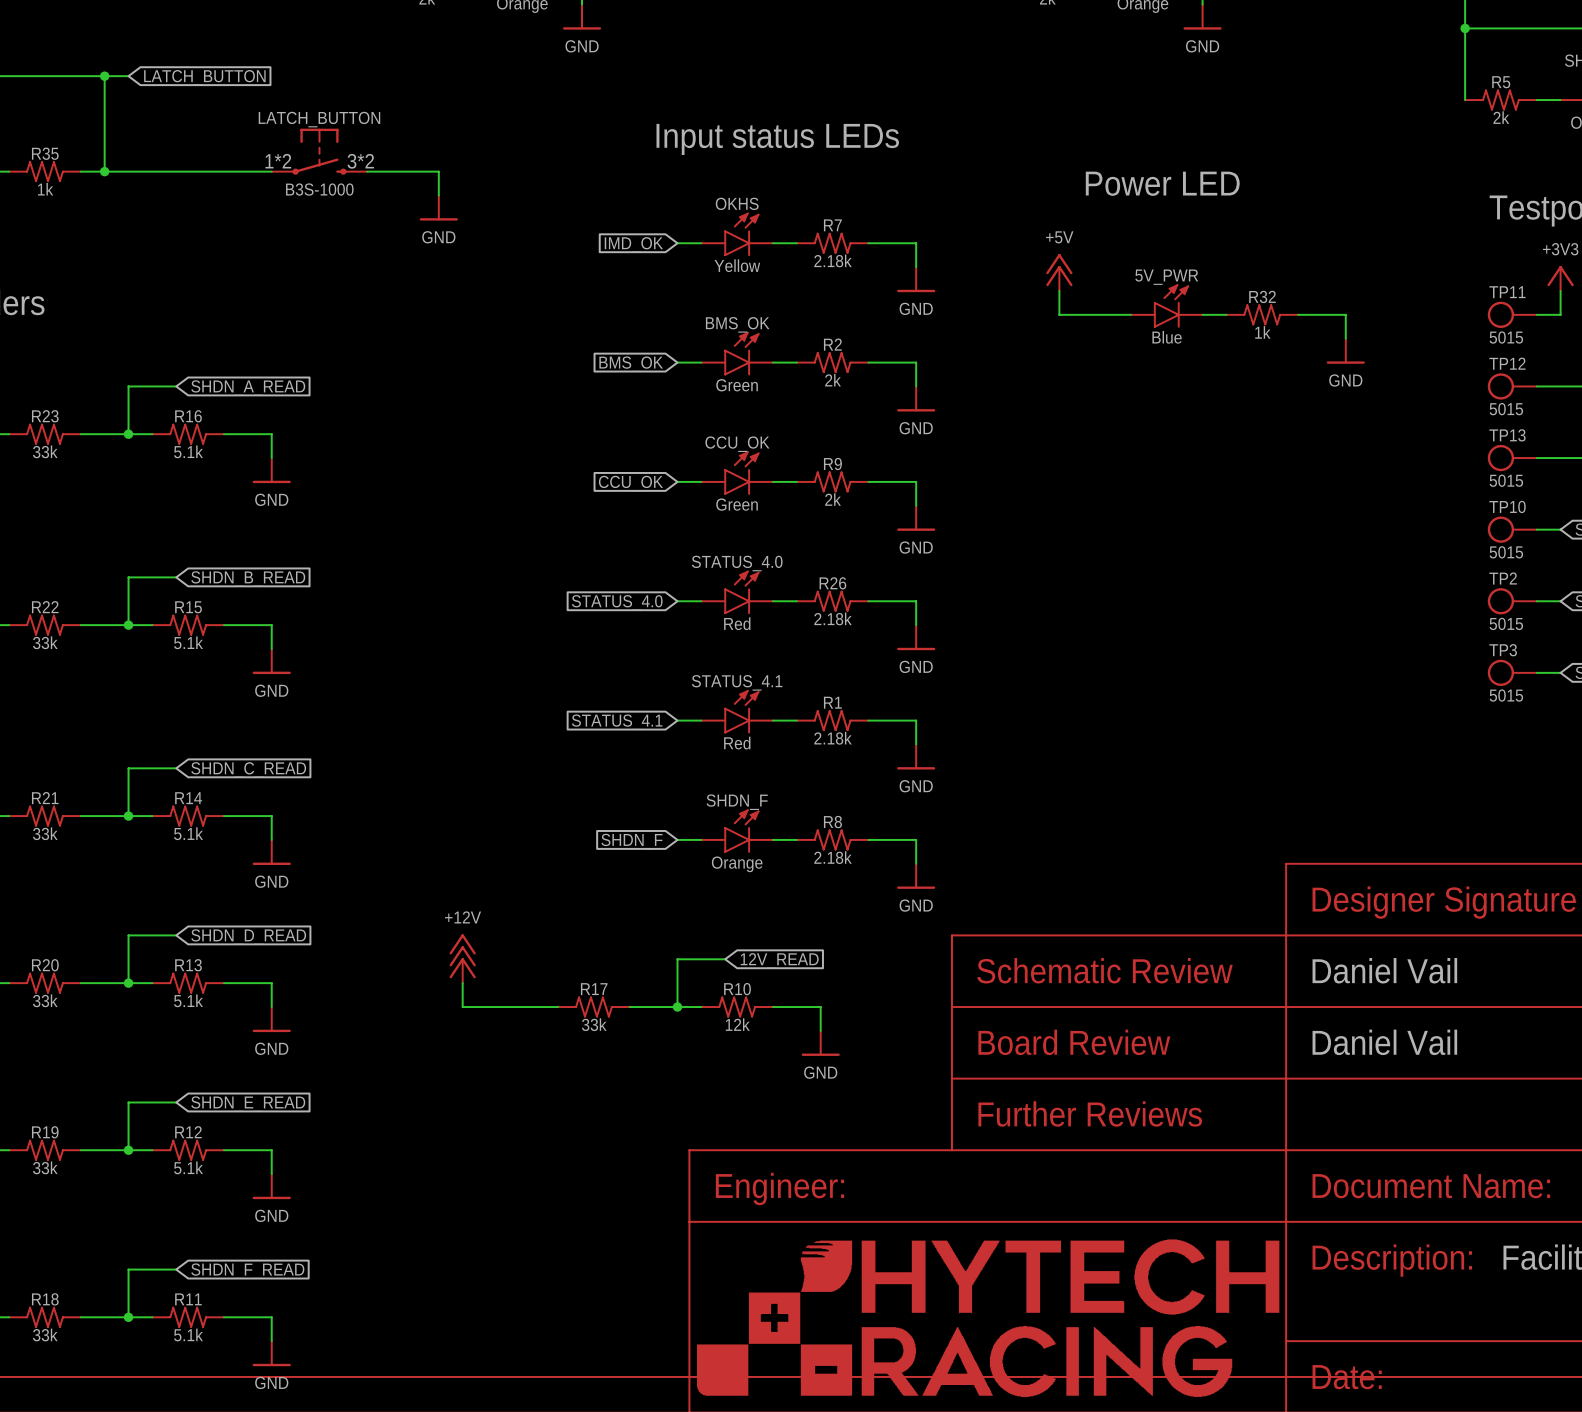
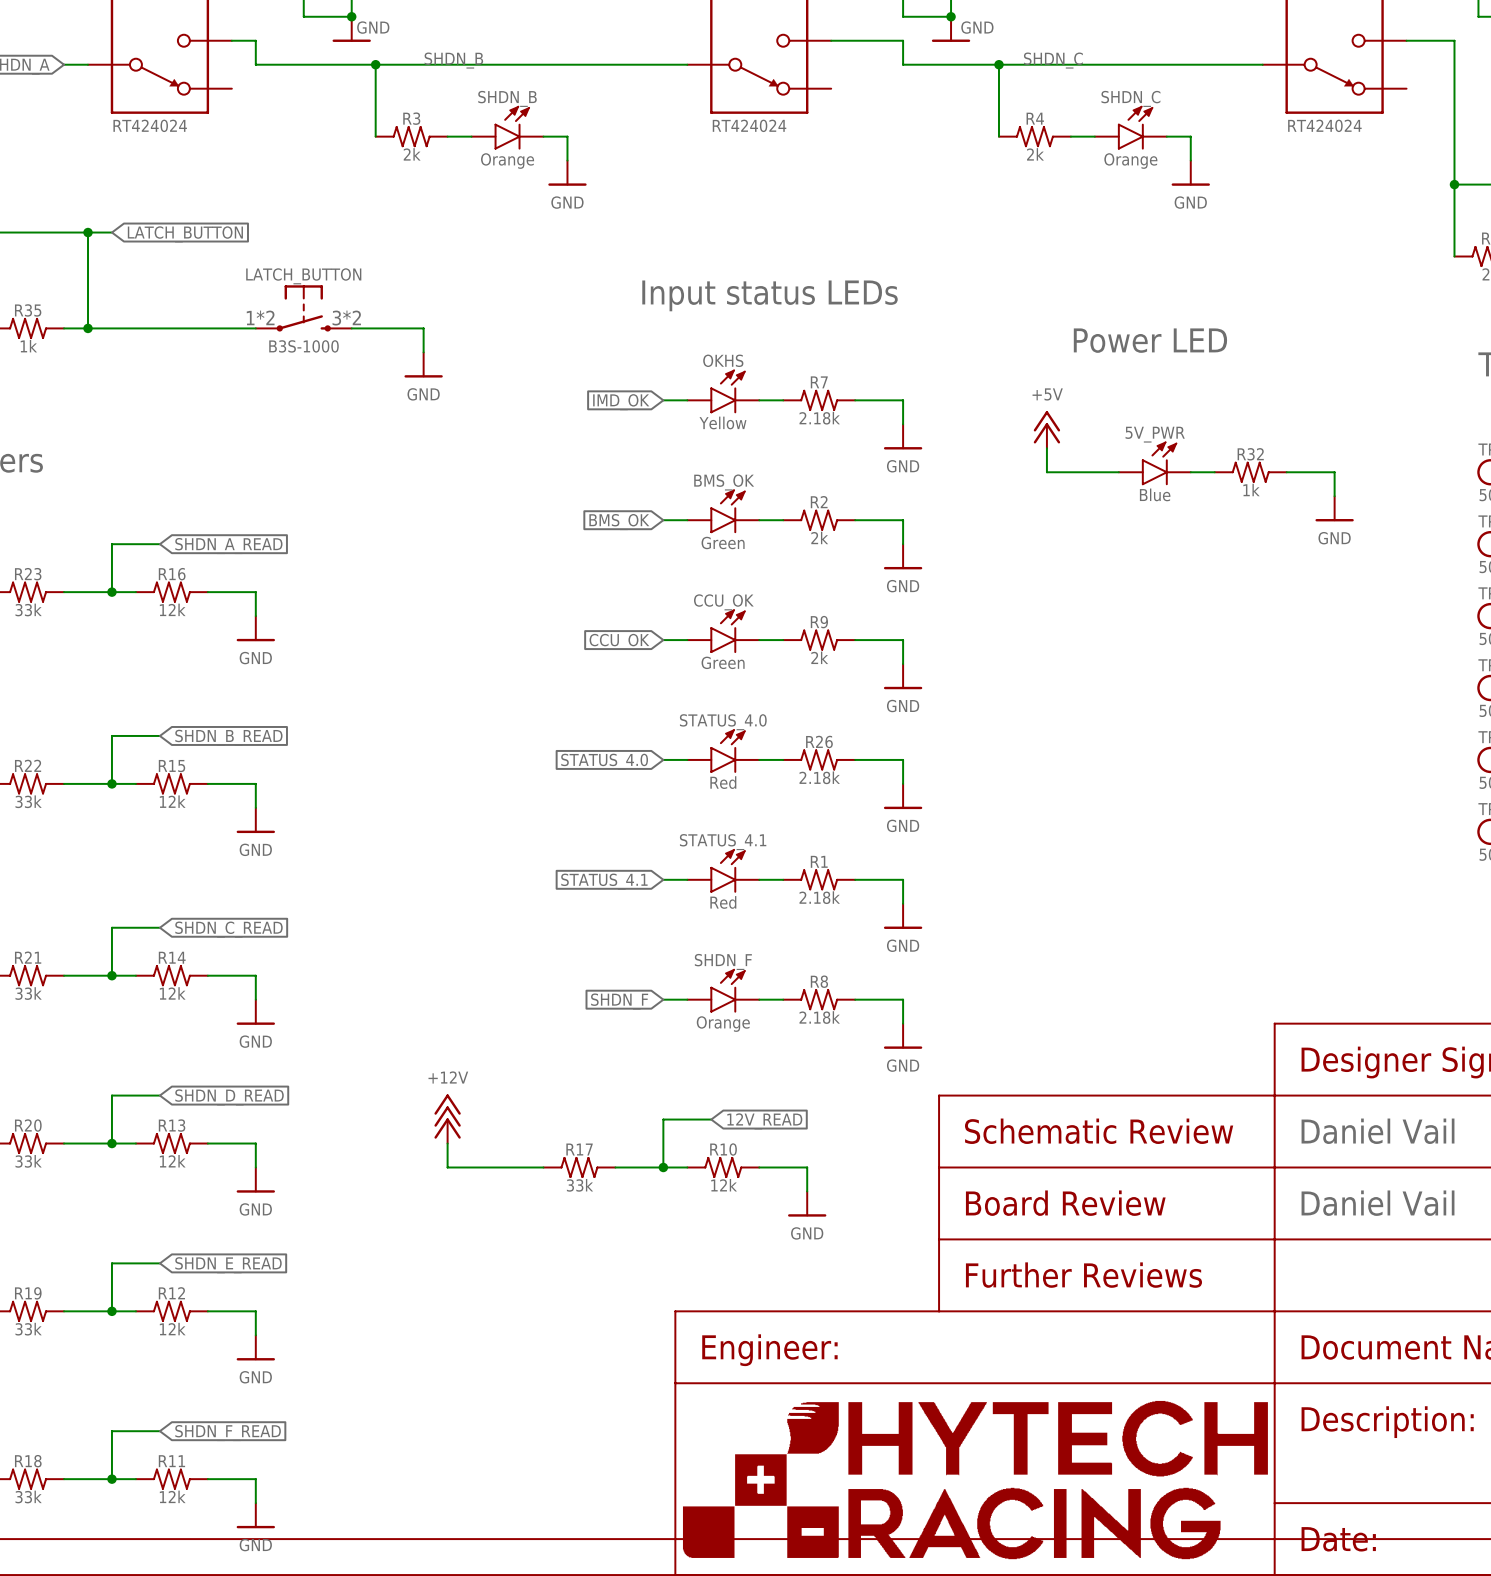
R16 text: 5.1k (188, 451) -> 12k (172, 609)
R15 text: 5.1k (188, 642) -> 12k (172, 801)
R14 text: 5.1k (188, 833) -> 12k (172, 993)
R13 text: 5.1k (188, 1000) -> 12k (172, 1161)
R12 text: 5.1k (188, 1167) -> 12k (172, 1329)
R11 text: 5.1k (188, 1334) -> 12k (172, 1496)

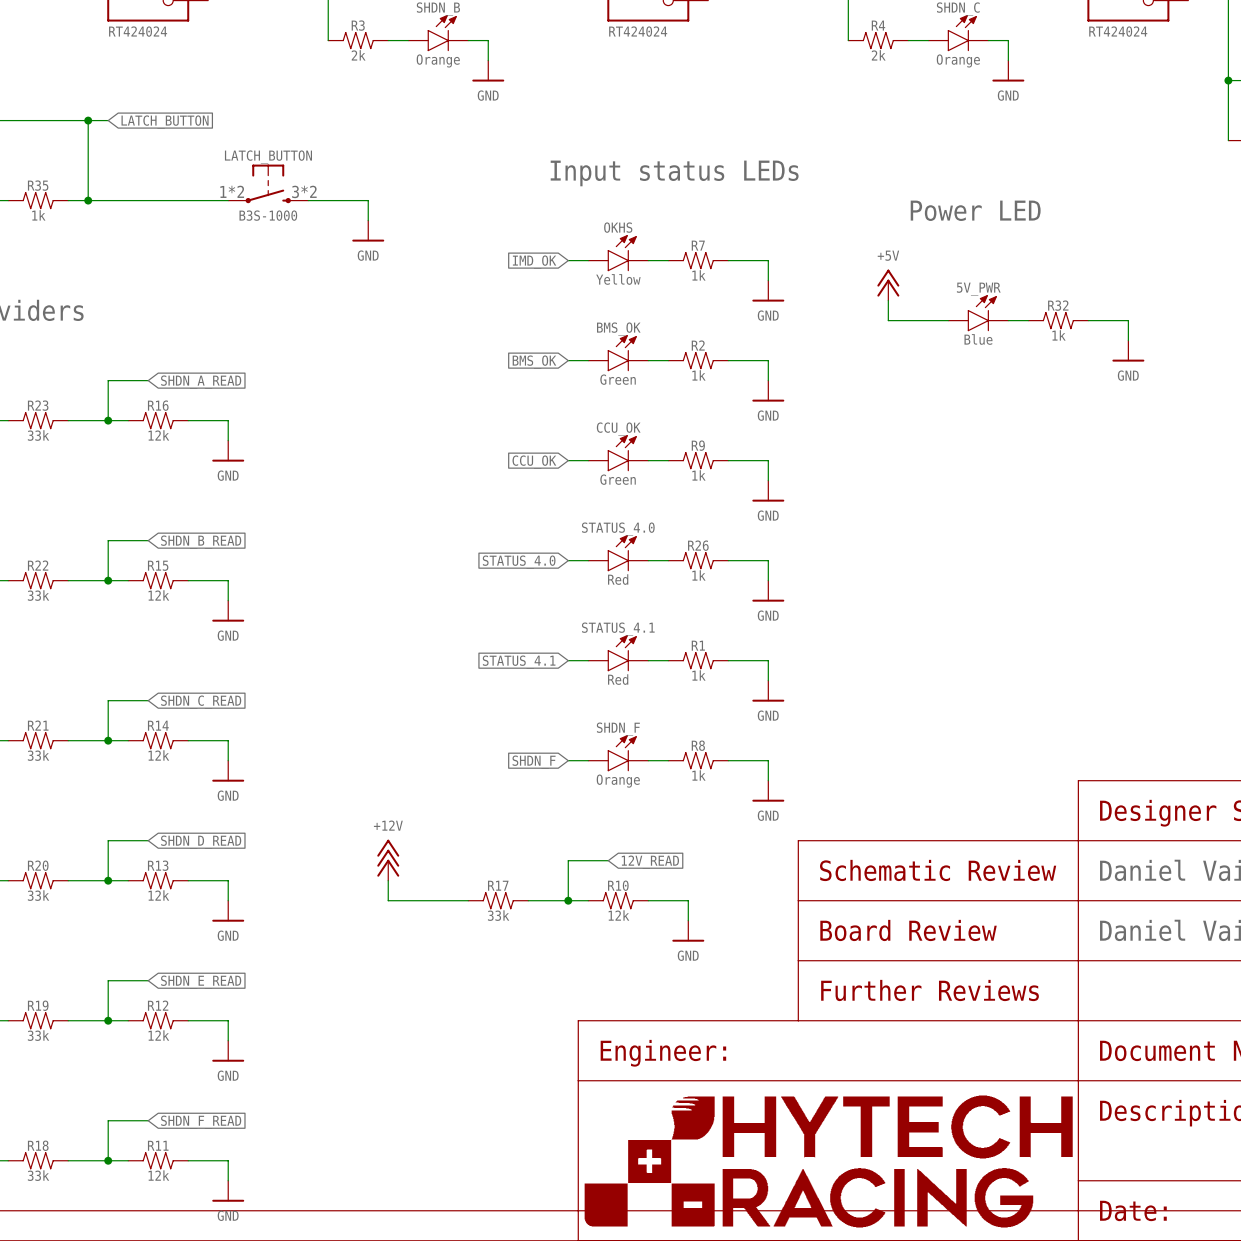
R7 text: 2.18k (819, 418) -> 1k (698, 275)
R2 text: 2k (819, 537) -> 1k (698, 375)
R9 text: 2k (819, 657) -> 1k (698, 475)
R26 text: 2.18k (819, 777) -> 1k (698, 575)
R1 text: 2.18k (819, 897) -> 1k (698, 675)
R8 text: 2.18k (819, 1017) -> 1k (698, 775)

